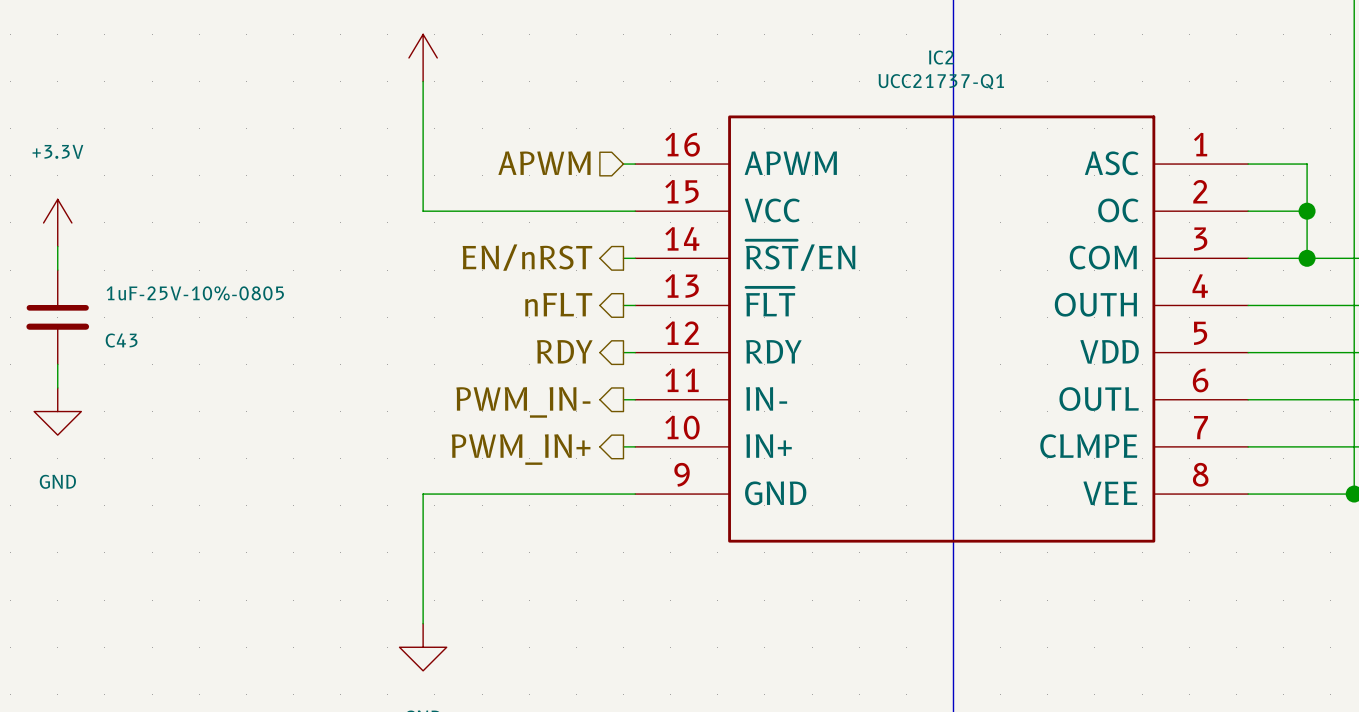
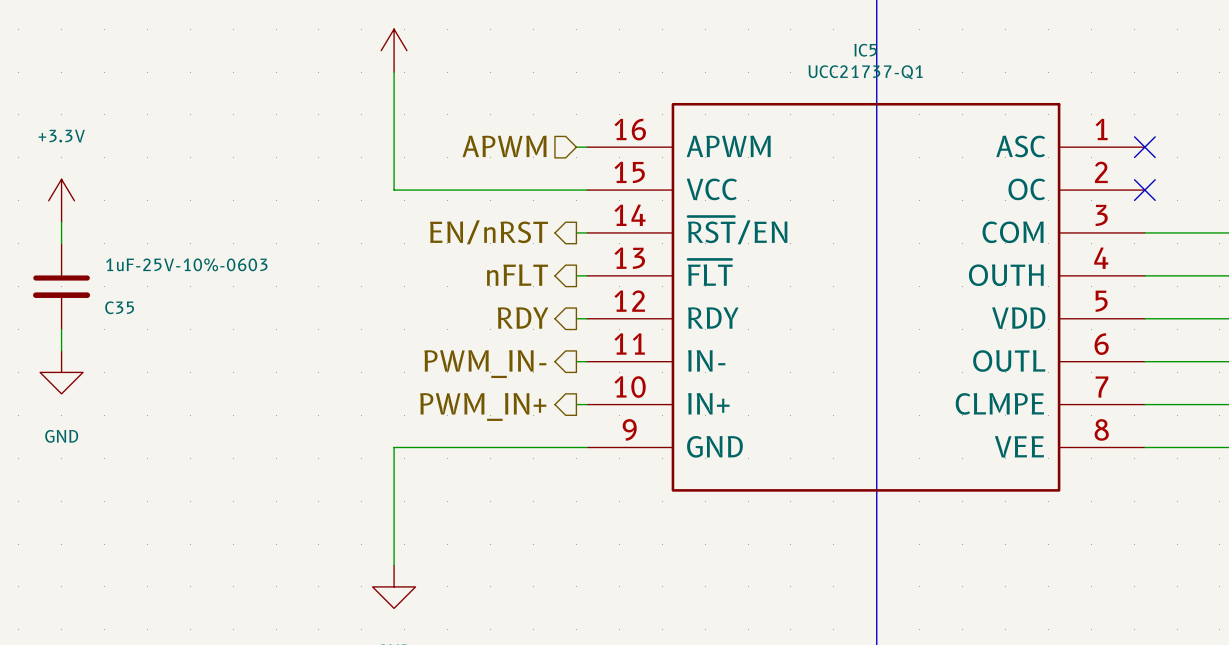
IC2 name: IC2 (941, 57) -> IC5 (865, 50)
wire: (1248, 164) (1307, 164) (1307, 258) -> none
no-connect mark: none -> (1144, 147)
wire: (1248, 211) (1307, 211) -> none
no-connect mark: none -> (1144, 190)
junction: (1307, 211) -> none
junction: (1307, 258) -> none
C43 value: 1uF-25V-10%-0805 (195, 293) -> 1uF-25V-10%-0603 (186, 264)
C43 name: C43 (121, 340) -> C35 (119, 307)

